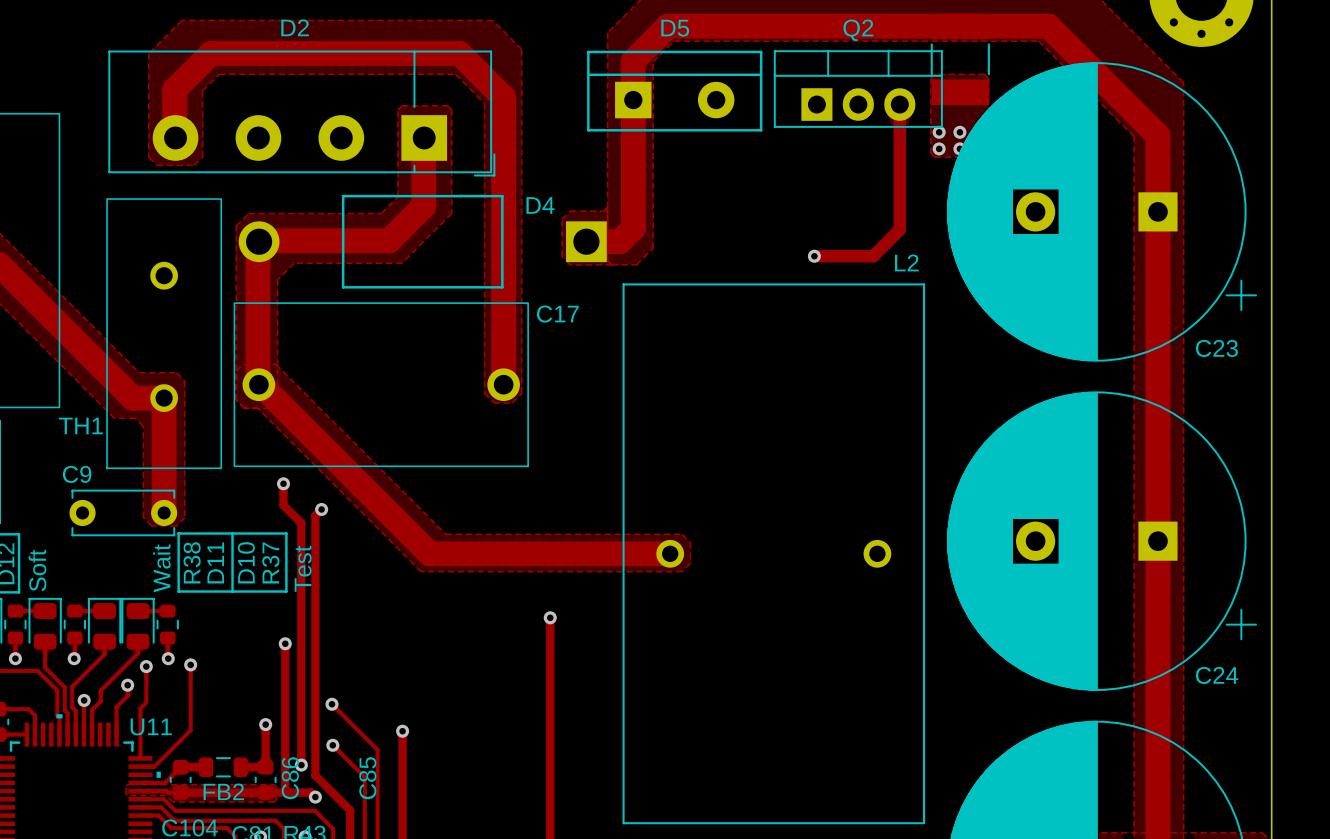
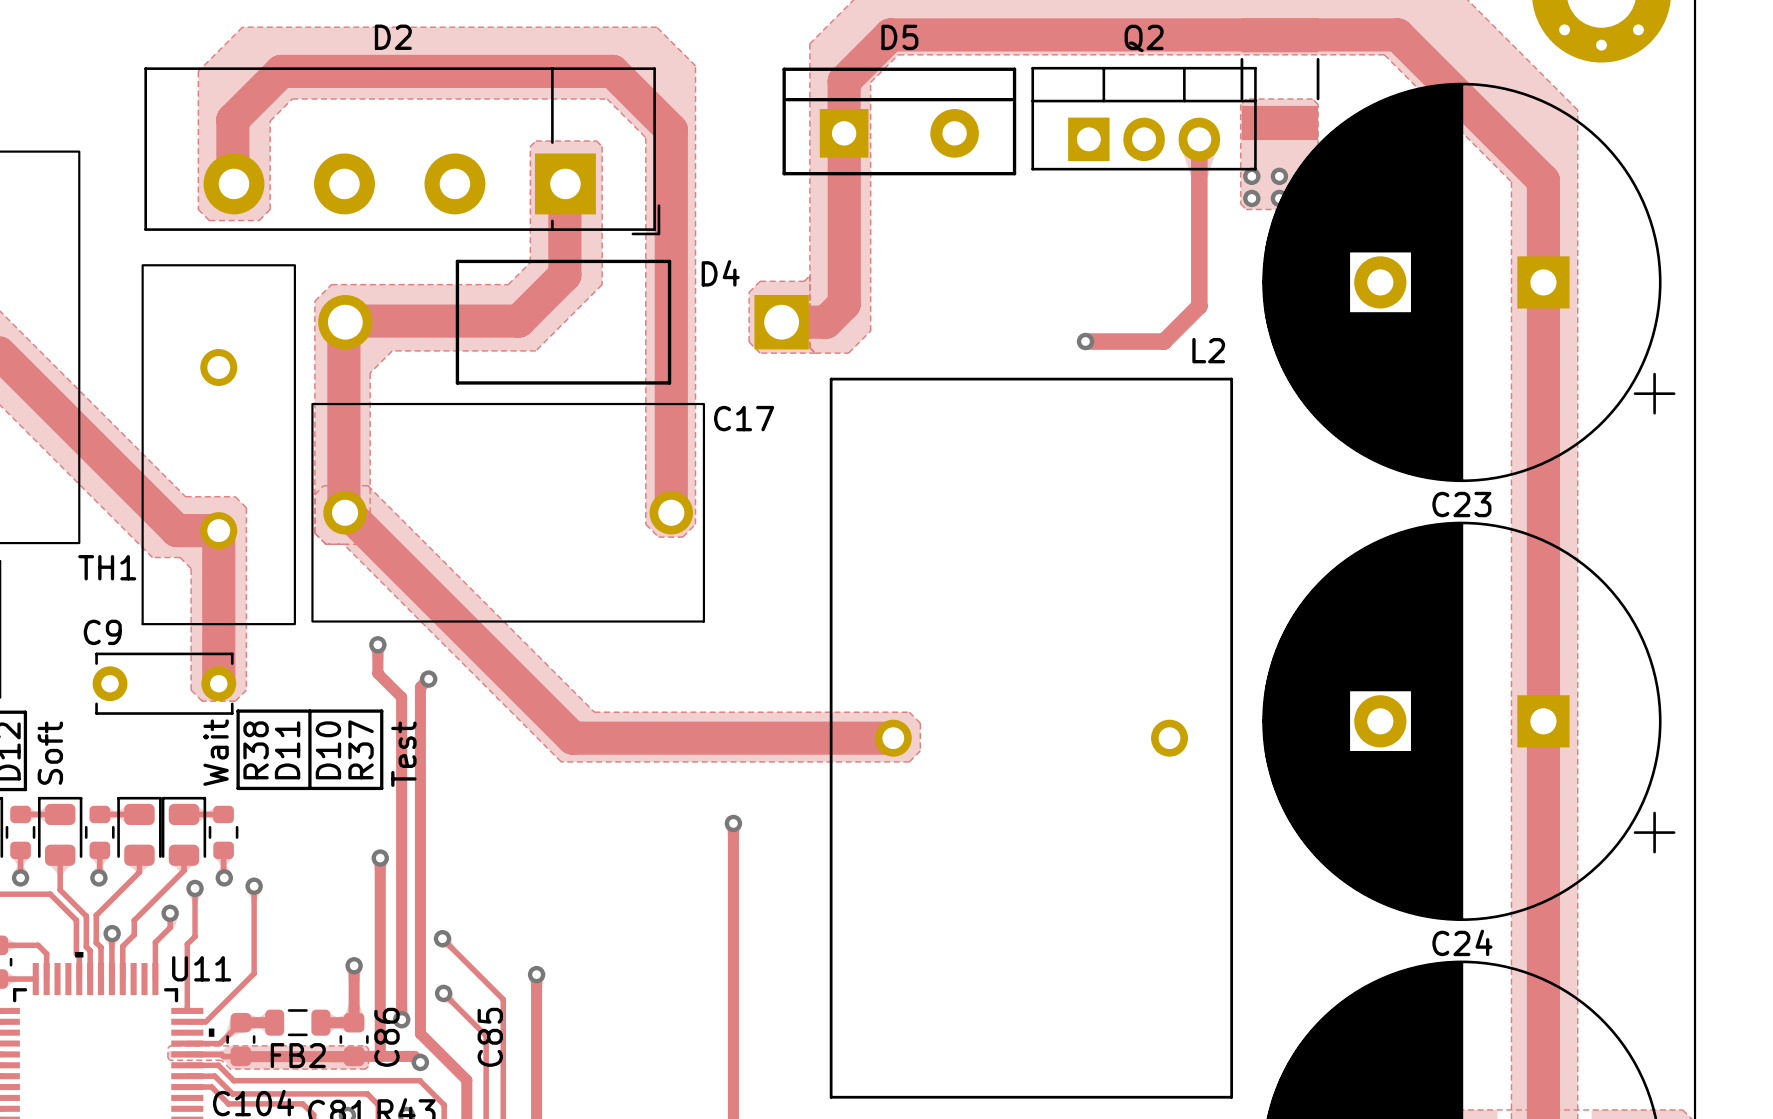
C23 name position: C23 (1216, 348) -> C23 (1461, 504)
C24 name position: C24 (1217, 675) -> C24 (1462, 942)

